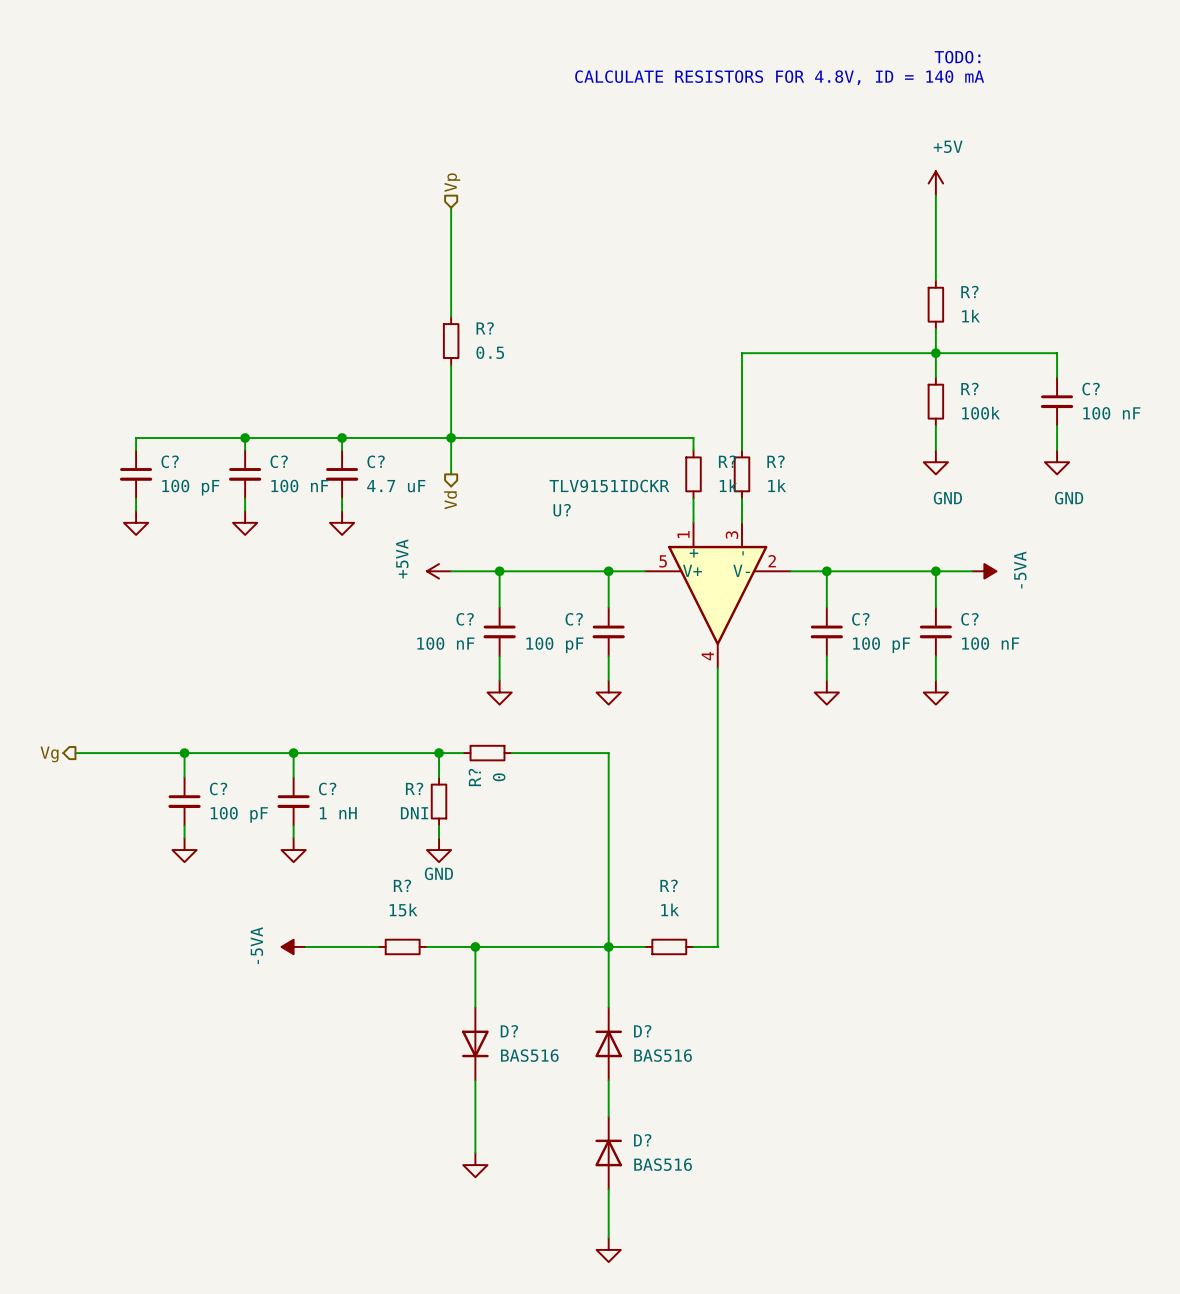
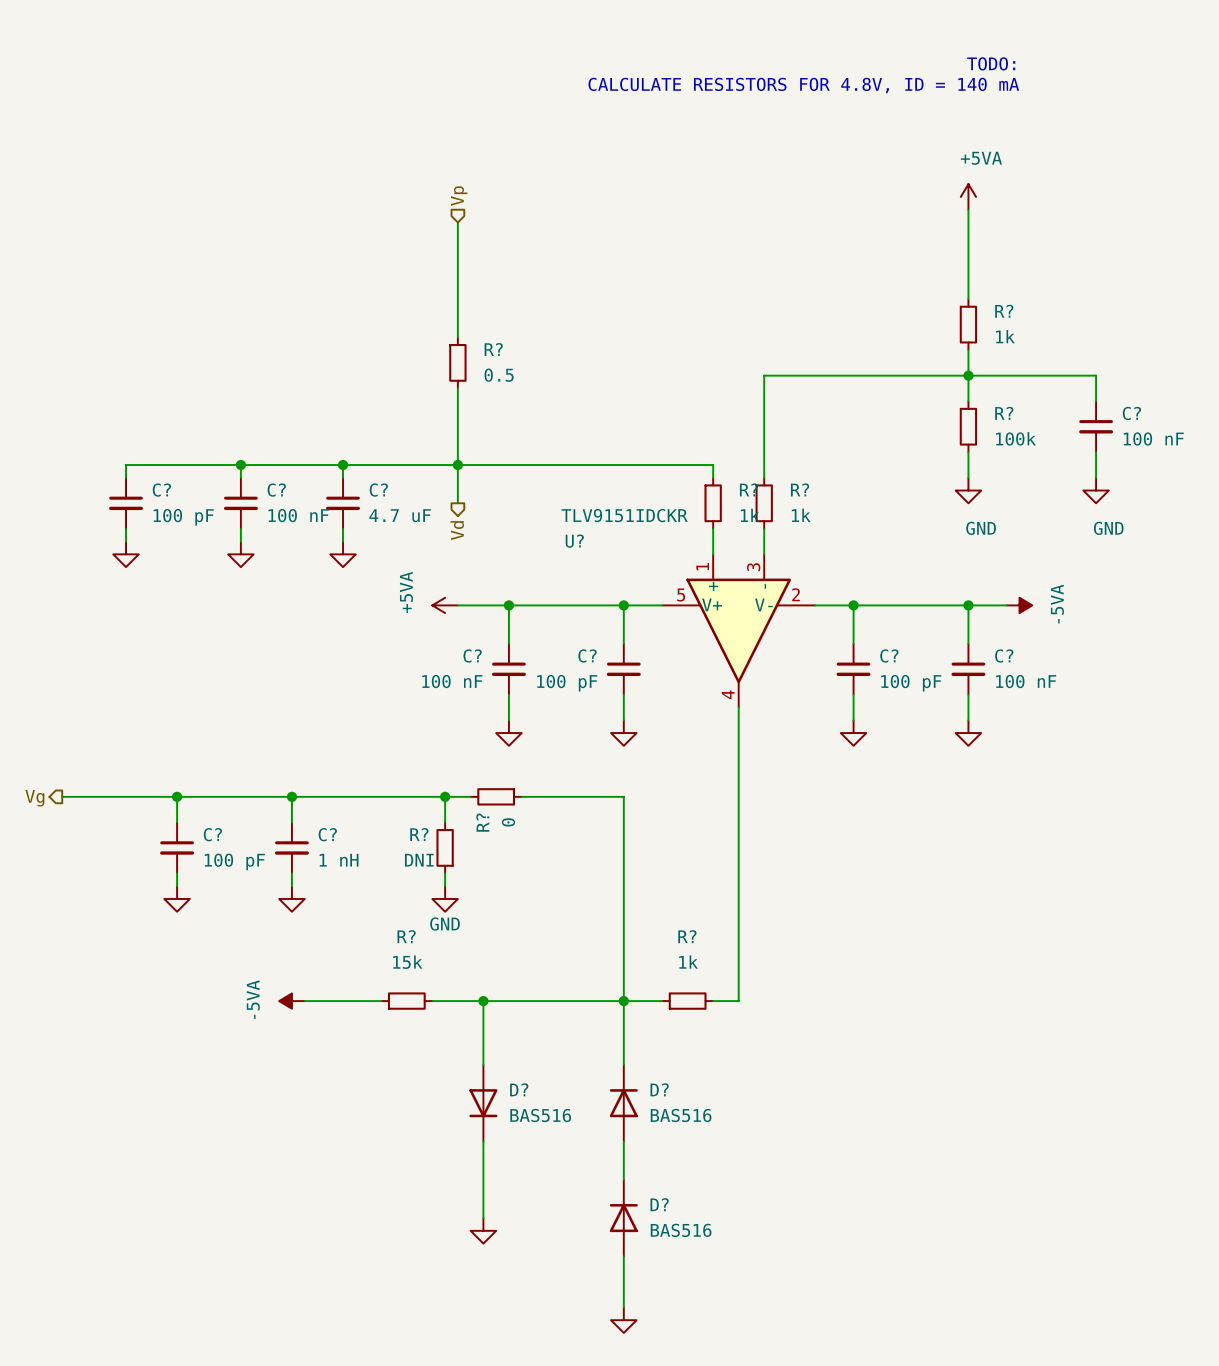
power symbol: +5V (935, 183) -> +5VA (968, 196)

